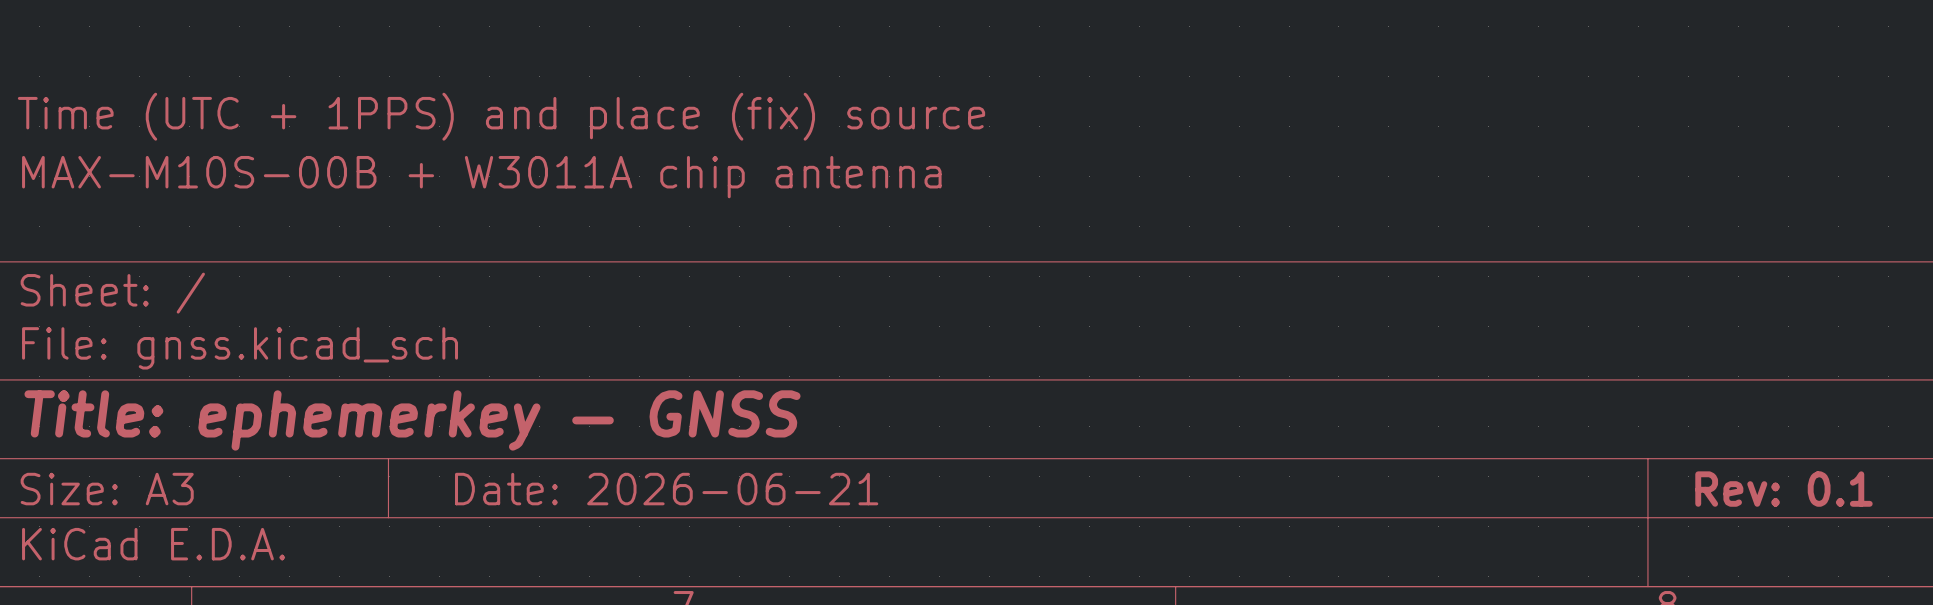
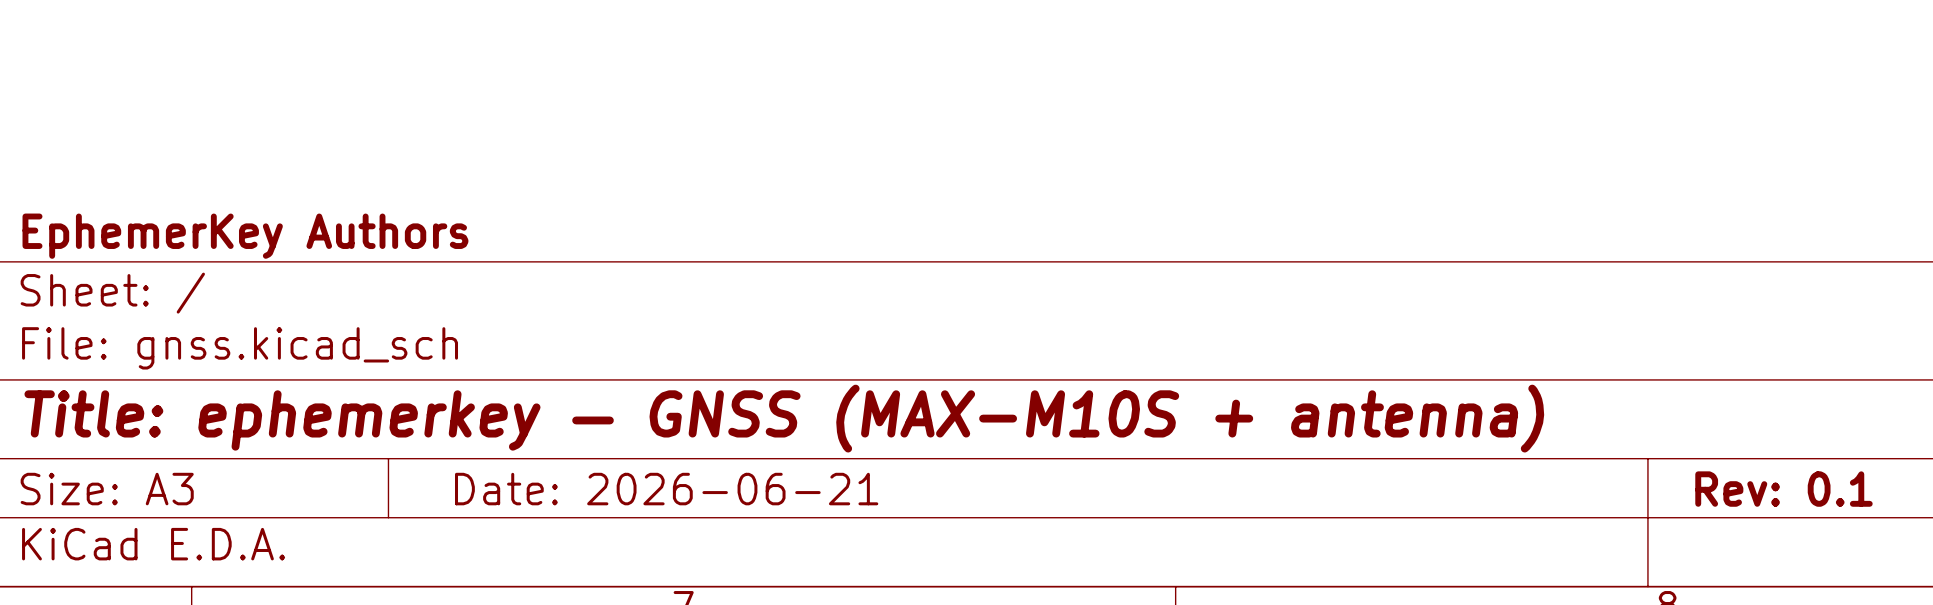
title block: Time (UTC + 1PPS) and place (fix) source (501, 116) -> none
title block: MAX-M10S-00B + W3011A chip antenna (481, 177) -> none
title block: none -> EphemerKey Authors (245, 236)
title block: Title: ephemerkey — GNSS (412, 420) -> Title: ephemerkey — GNSS (MAX-M10S + antenna) (784, 418)

